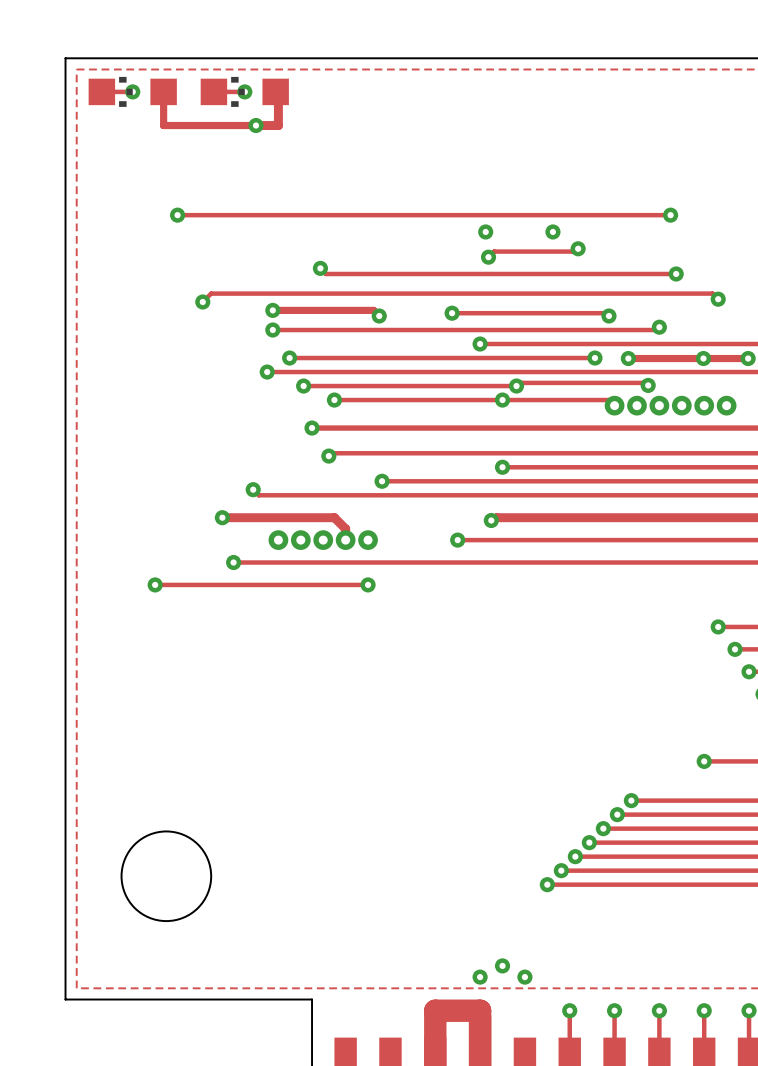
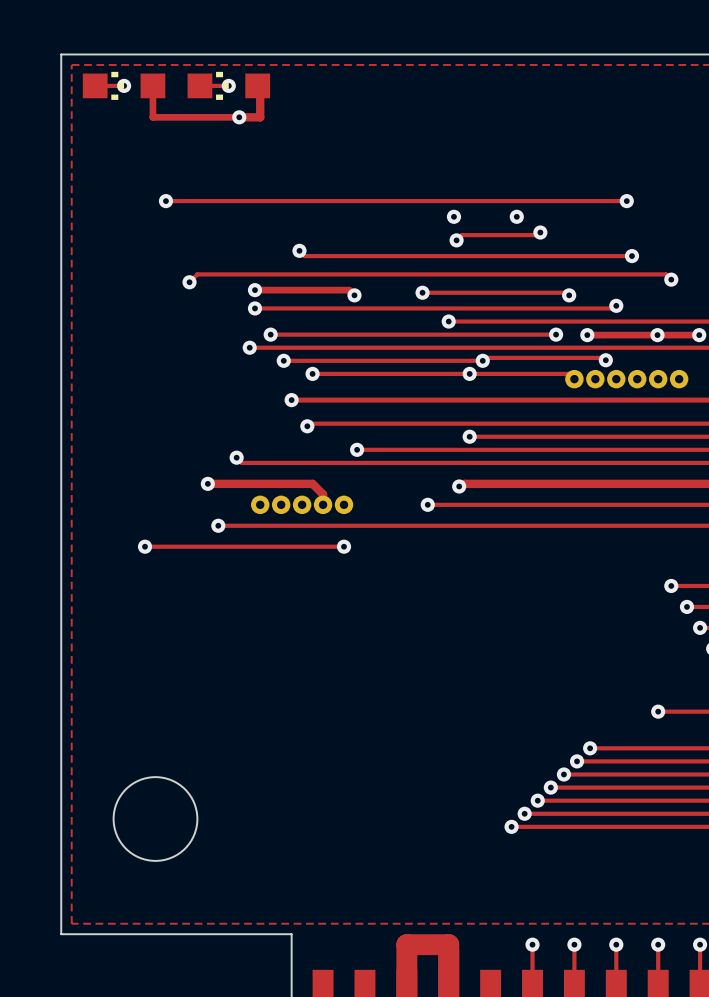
via: (502, 965) -> none
via: (480, 977) -> none
via: (524, 977) -> none

